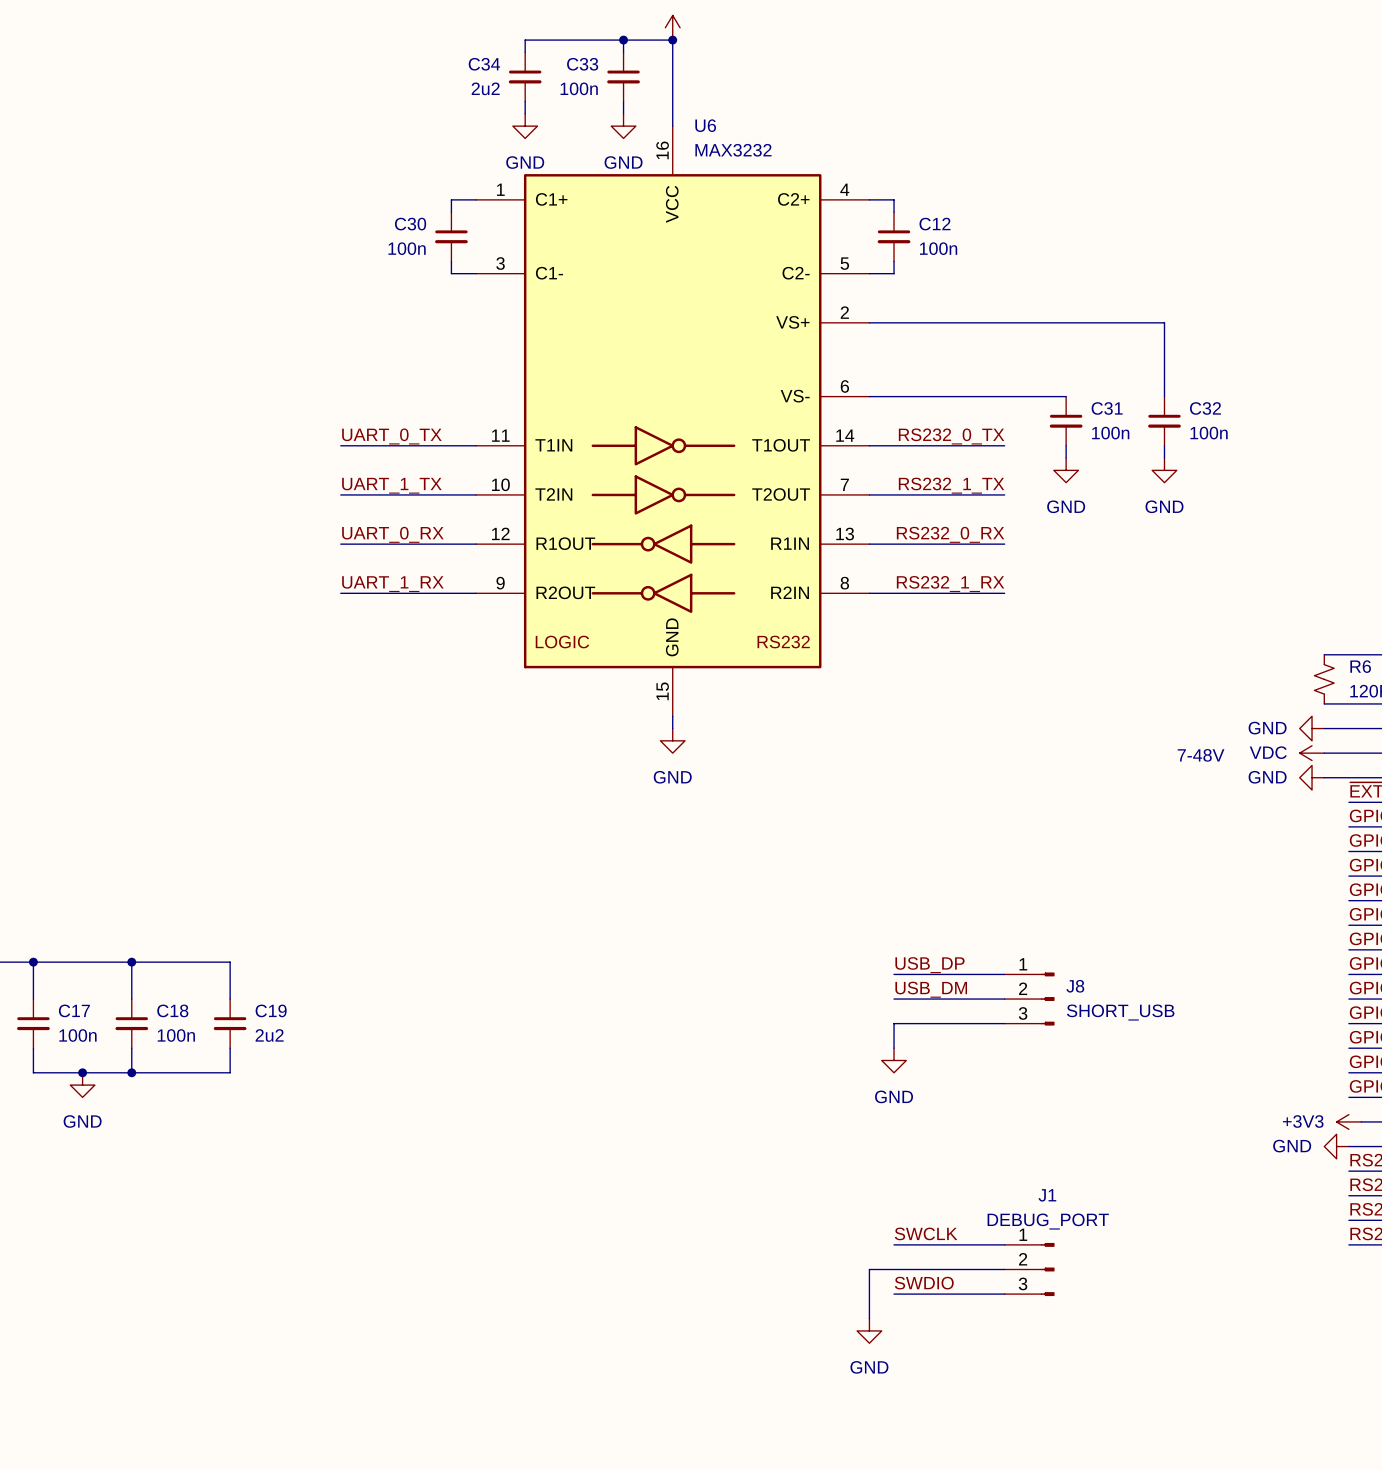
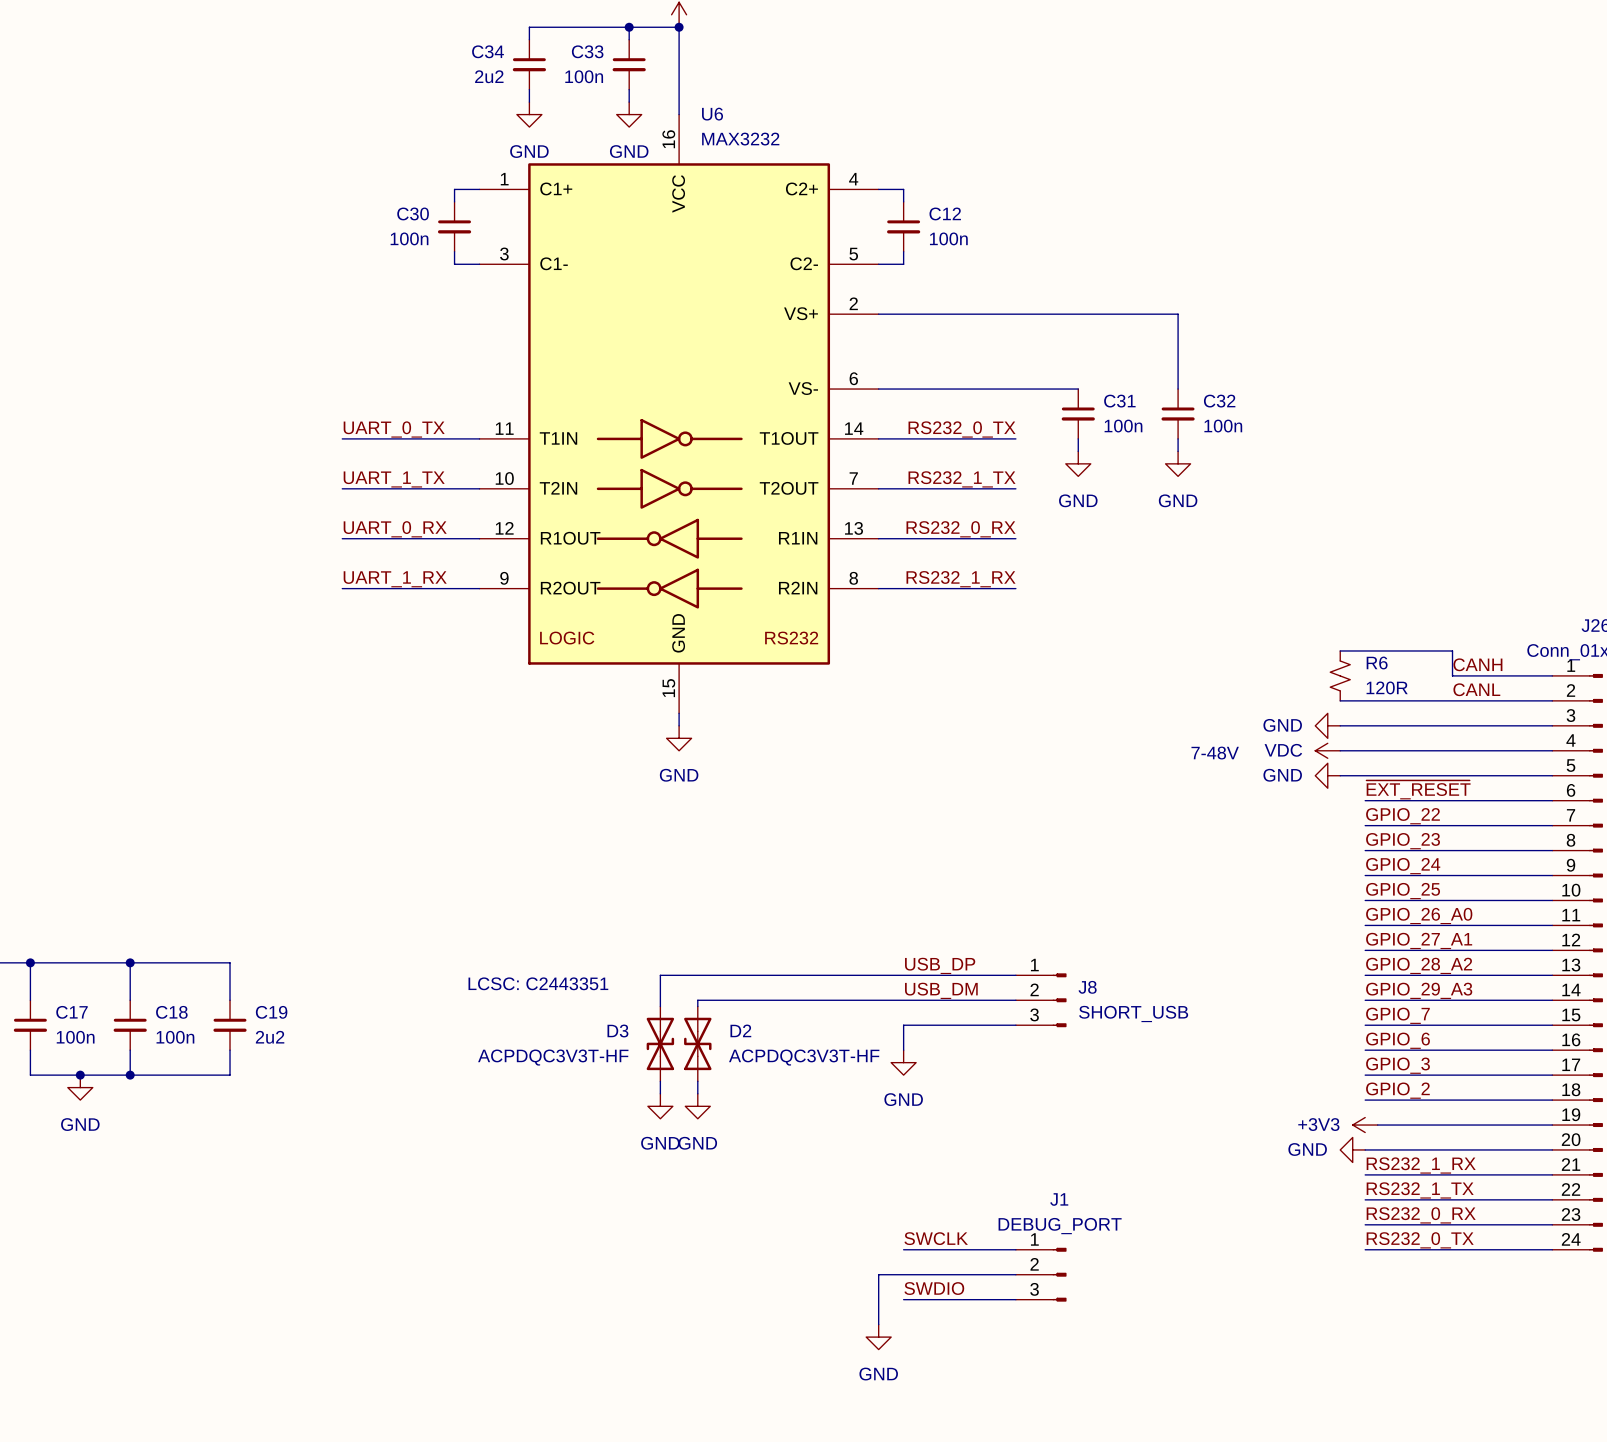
wire: none -> (903, 975) (660, 975) (660, 1006)
text: none -> LCSC: C2443351 (538, 983)
wire: none -> (903, 1000) (697, 1000) (697, 1006)
D3: none -> ACPDQC3V3T-HF (660, 1043)
D2: none -> ACPDQC3V3T-HF (697, 1043)
wire: none -> (660, 1081) (660, 1093)
wire: none -> (697, 1081) (697, 1093)
power symbol: none -> GND (660, 1106)
power symbol: none -> GND (697, 1106)

